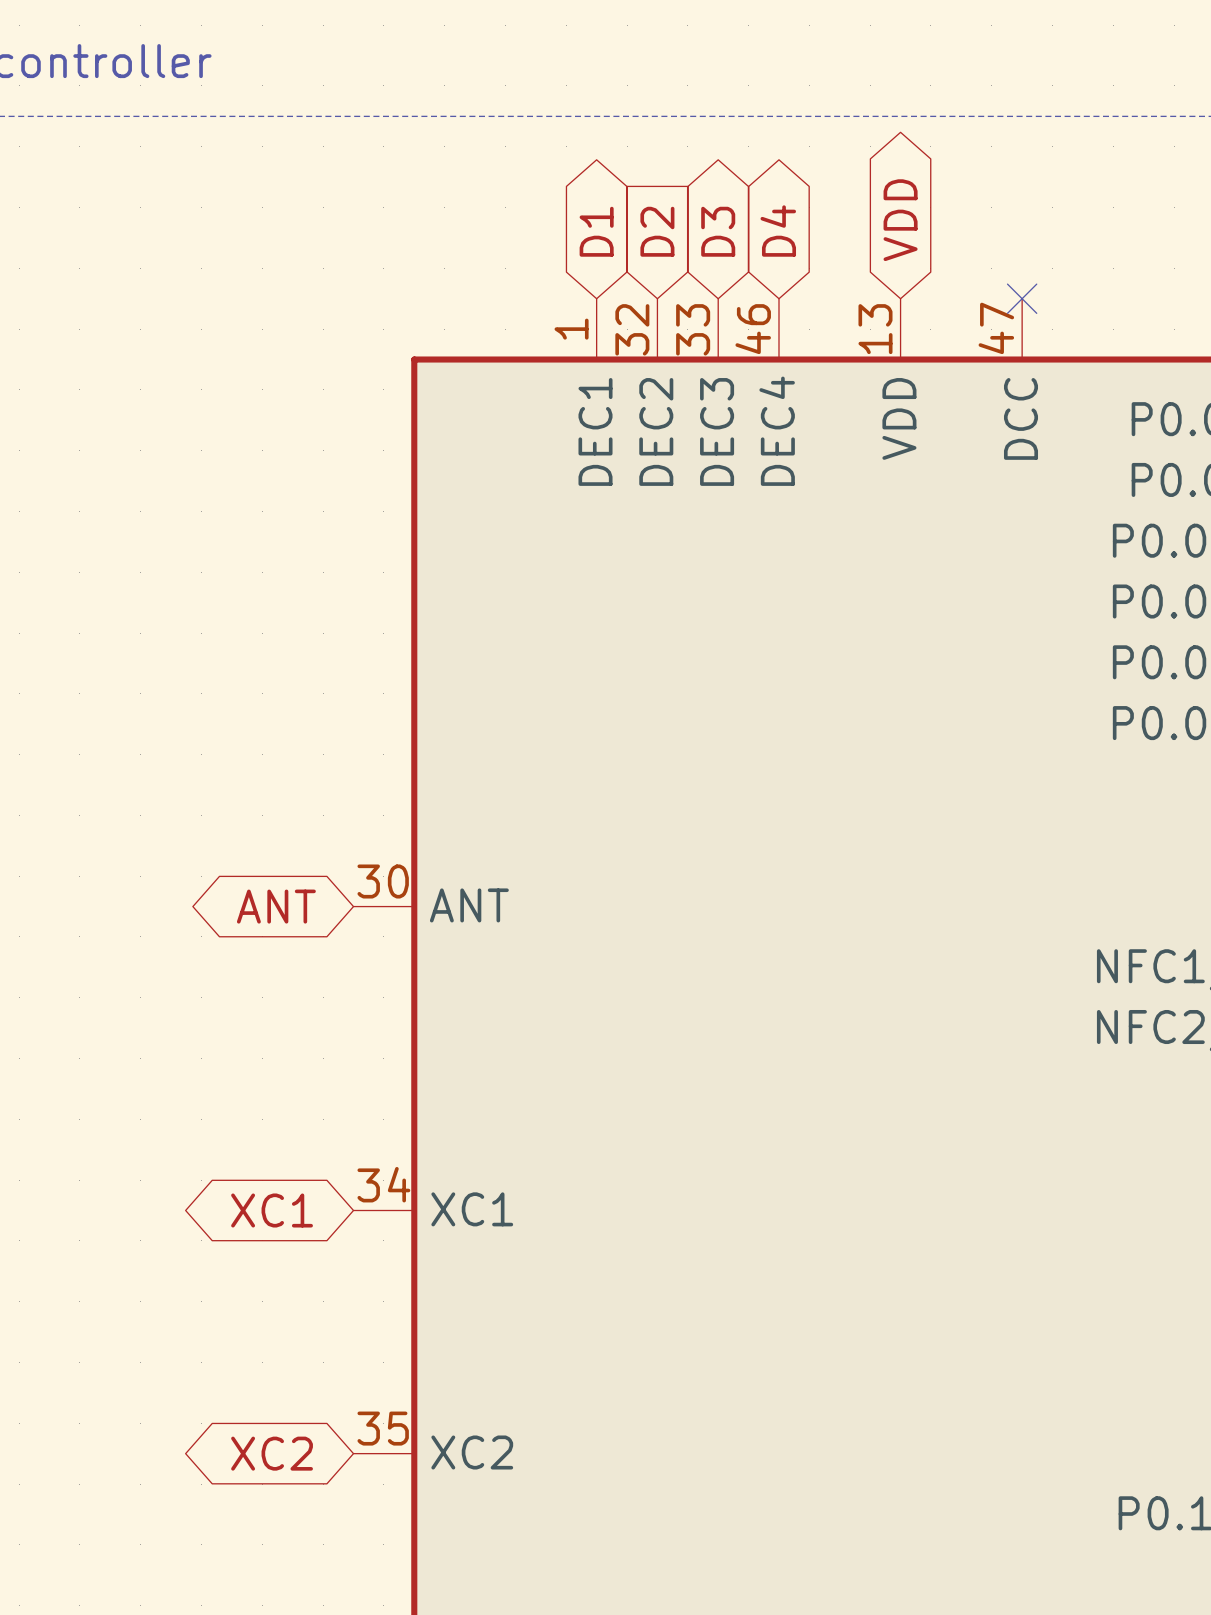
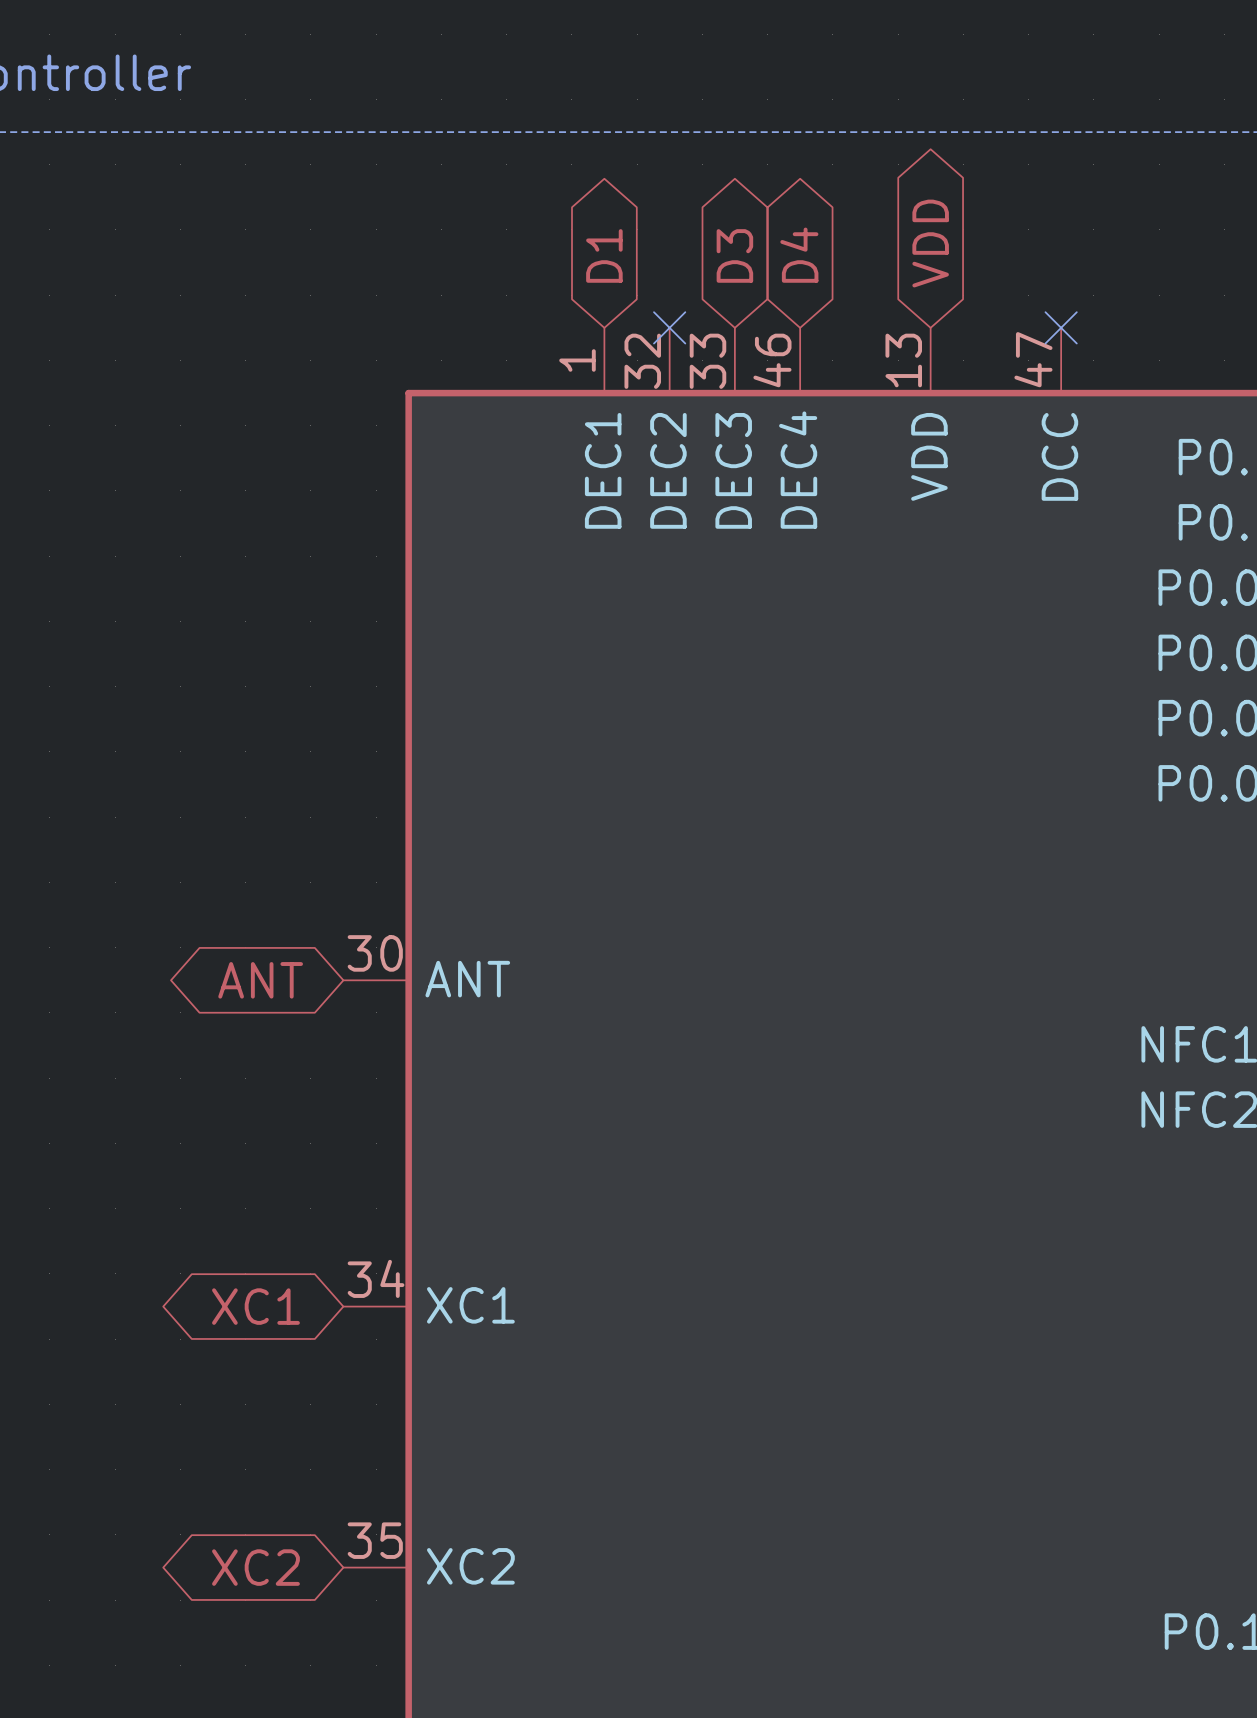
global label: D2 (657, 231) -> none
no-connect mark: none -> (669, 327)

